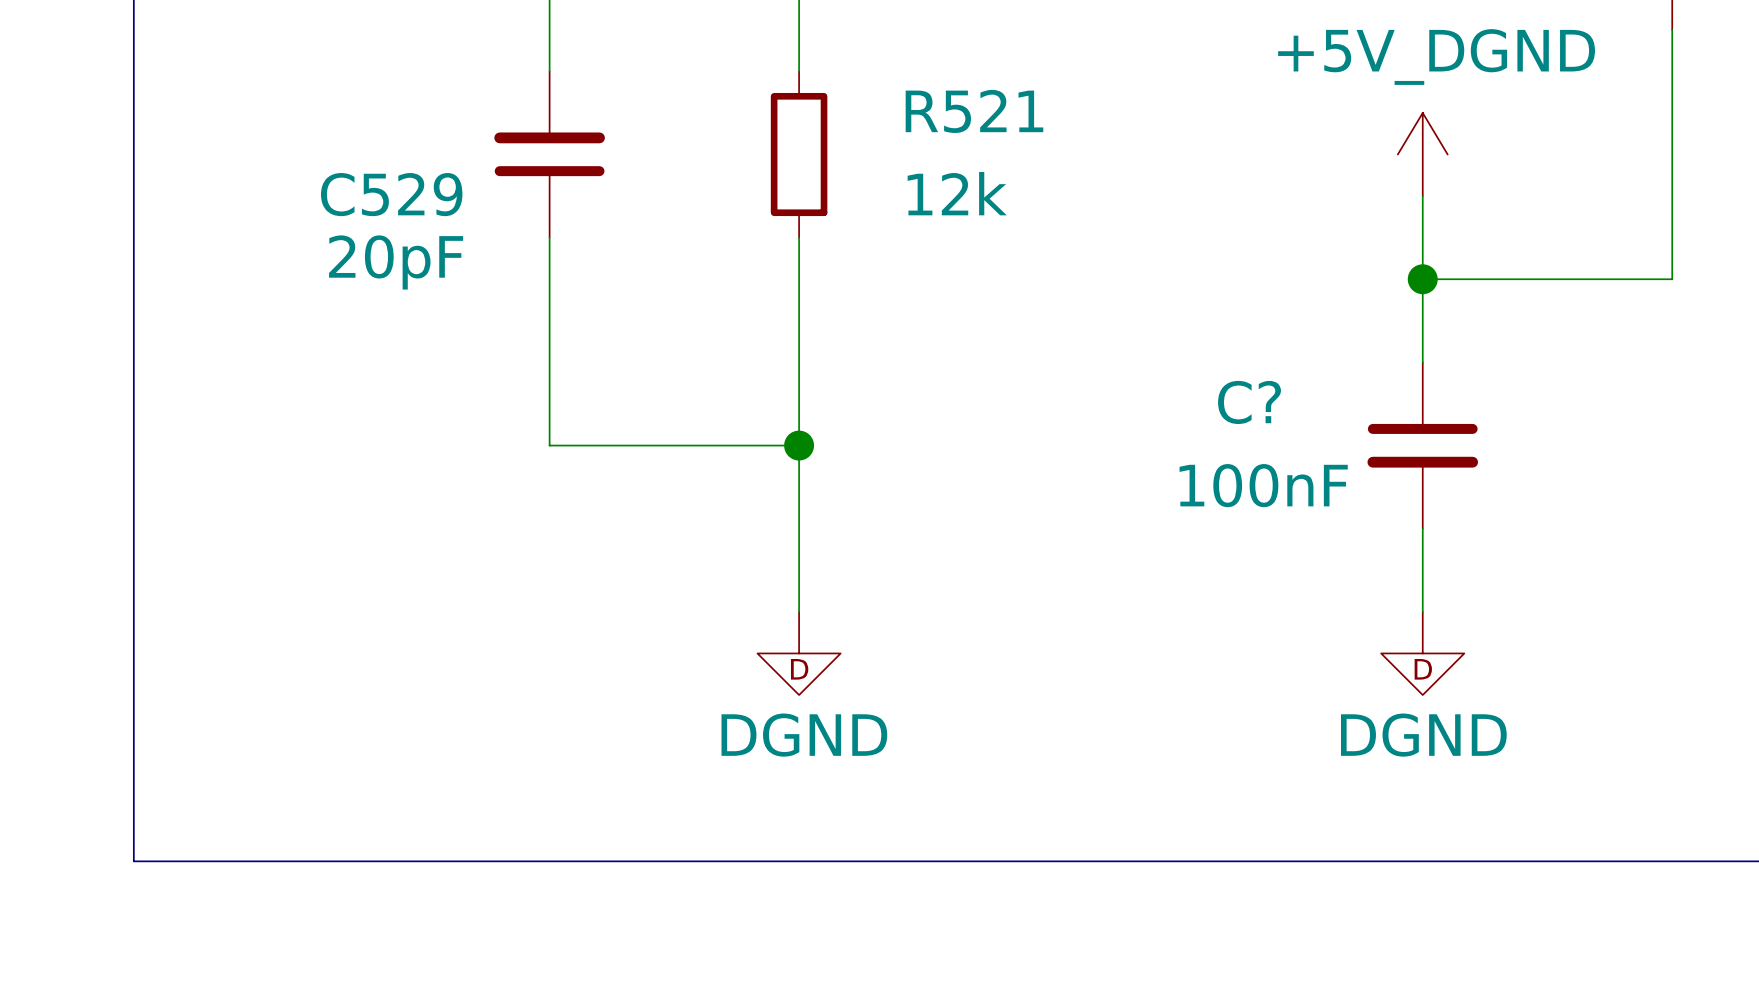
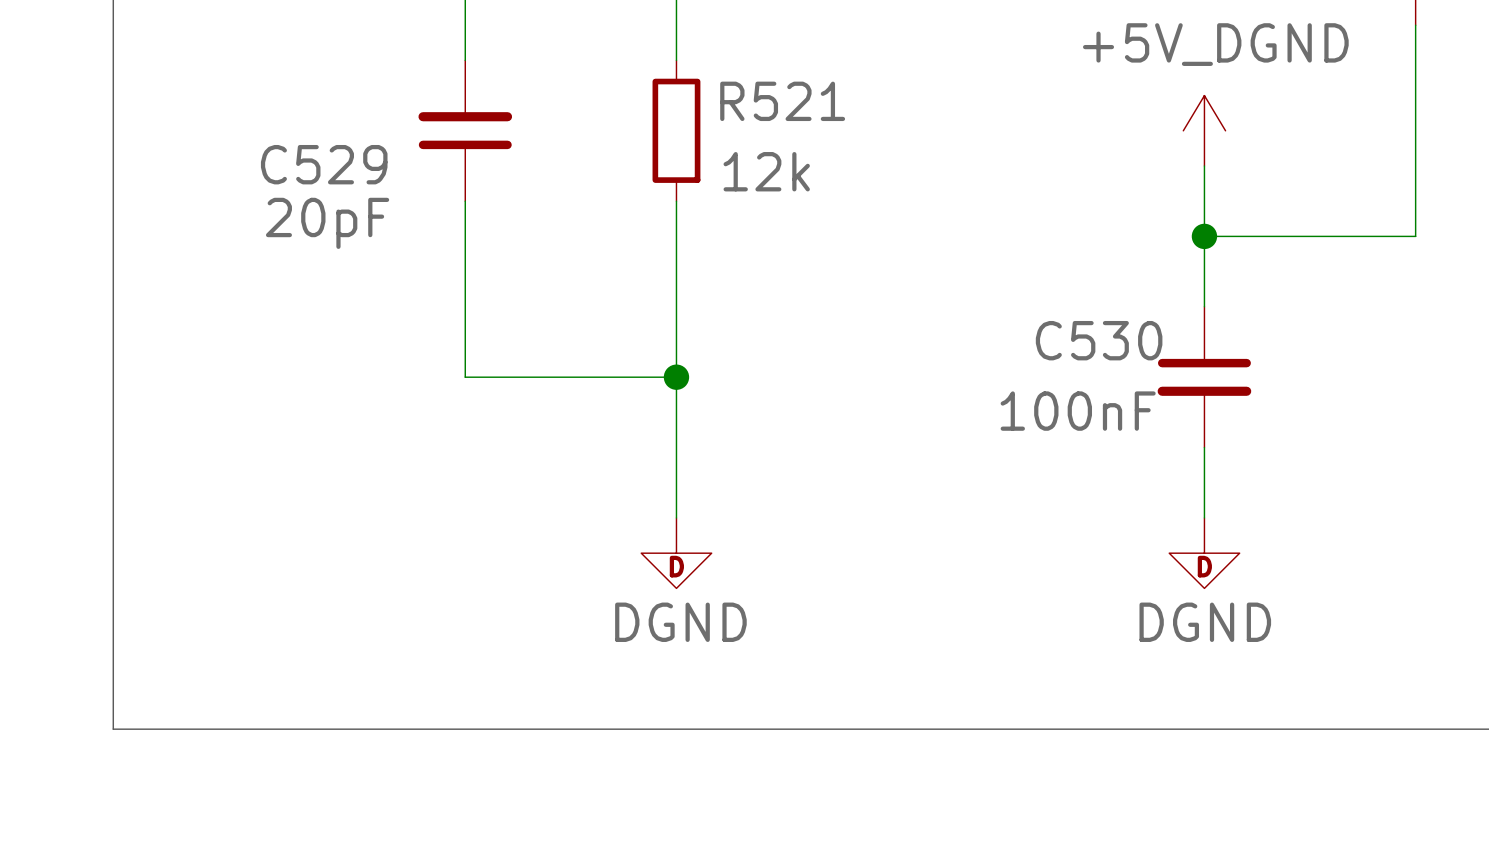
R521 name position: R521 (974, 111) -> R521 (782, 101)
R521 value position: 12k (957, 193) -> 12k (766, 171)
C? name: C? (1249, 402) -> C530 (1099, 340)

